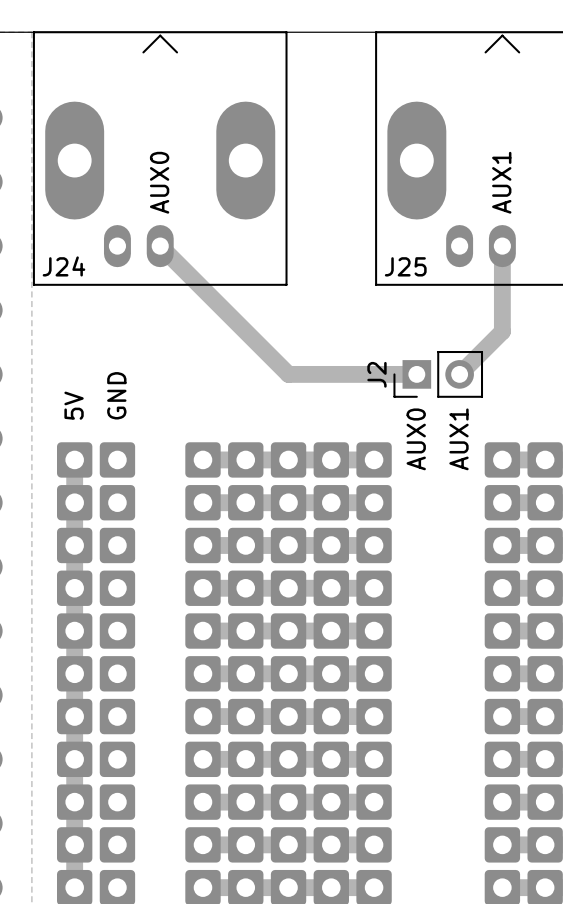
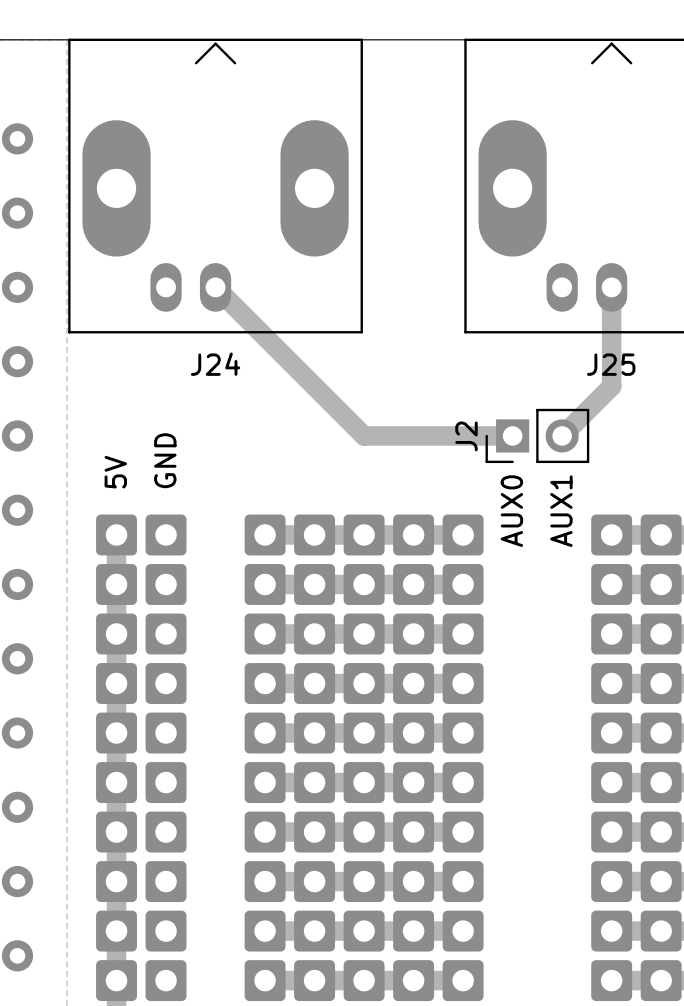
text: AUX0 (159, 182) -> none
text: AUX1 (501, 182) -> none
J24 name position: J24 (63, 266) -> J24 (215, 364)
J25 name position: J25 (405, 266) -> J25 (611, 364)

